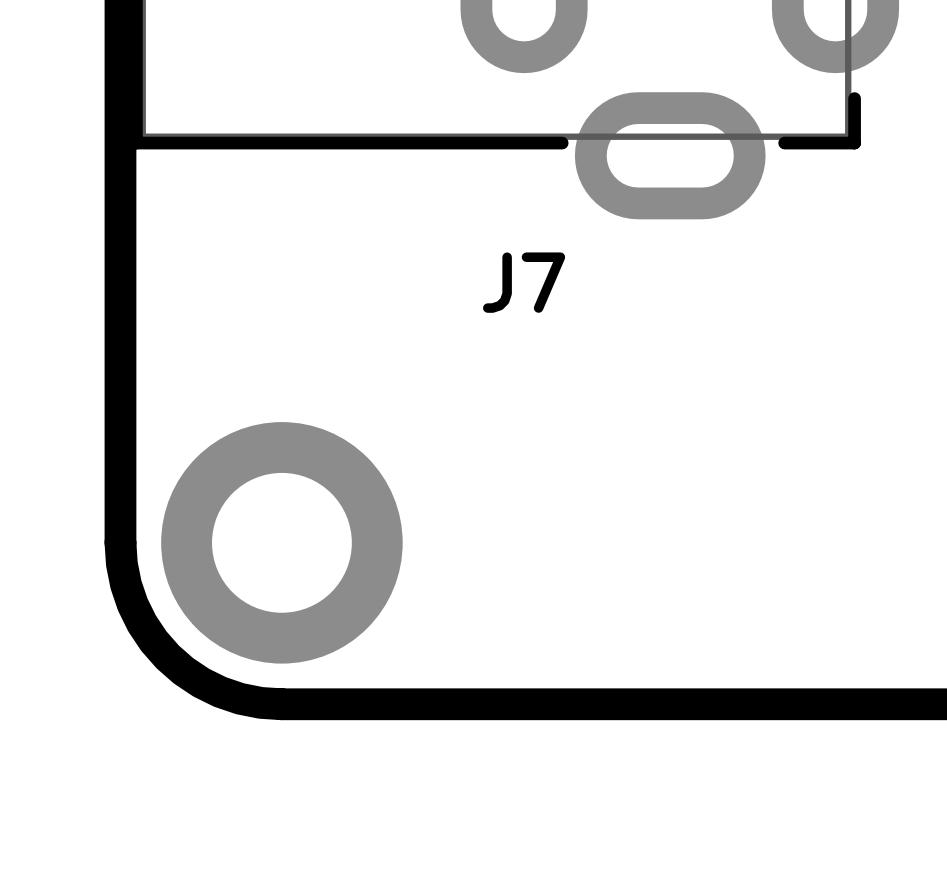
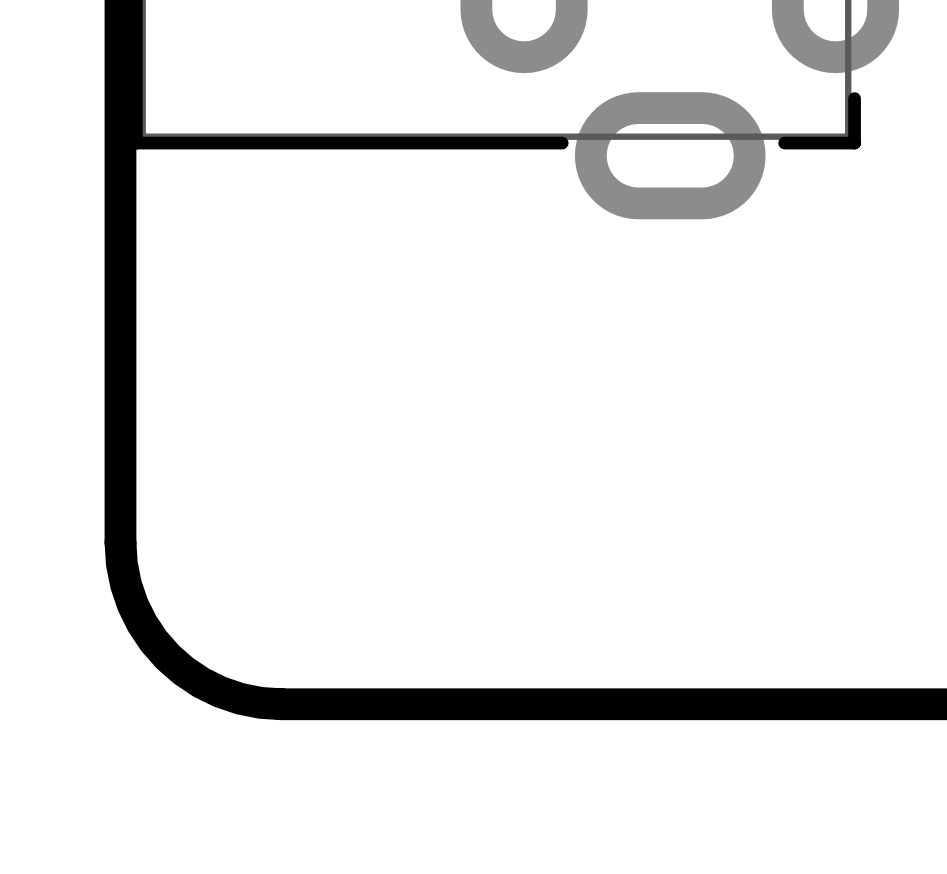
J7 name: J7 (524, 282) -> none
part: (281, 542) -> none

